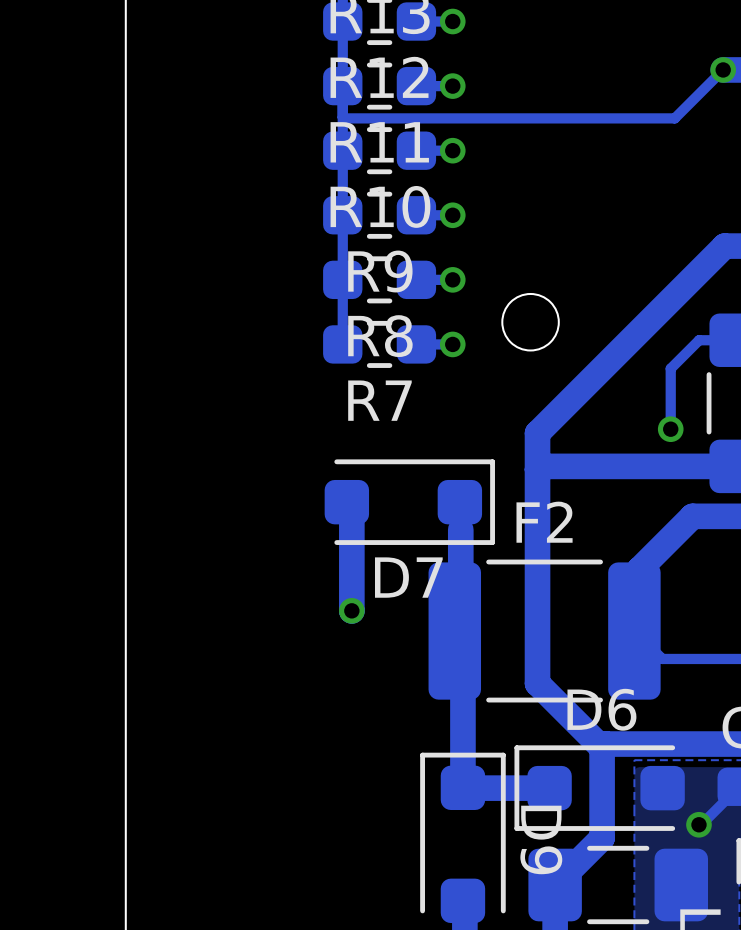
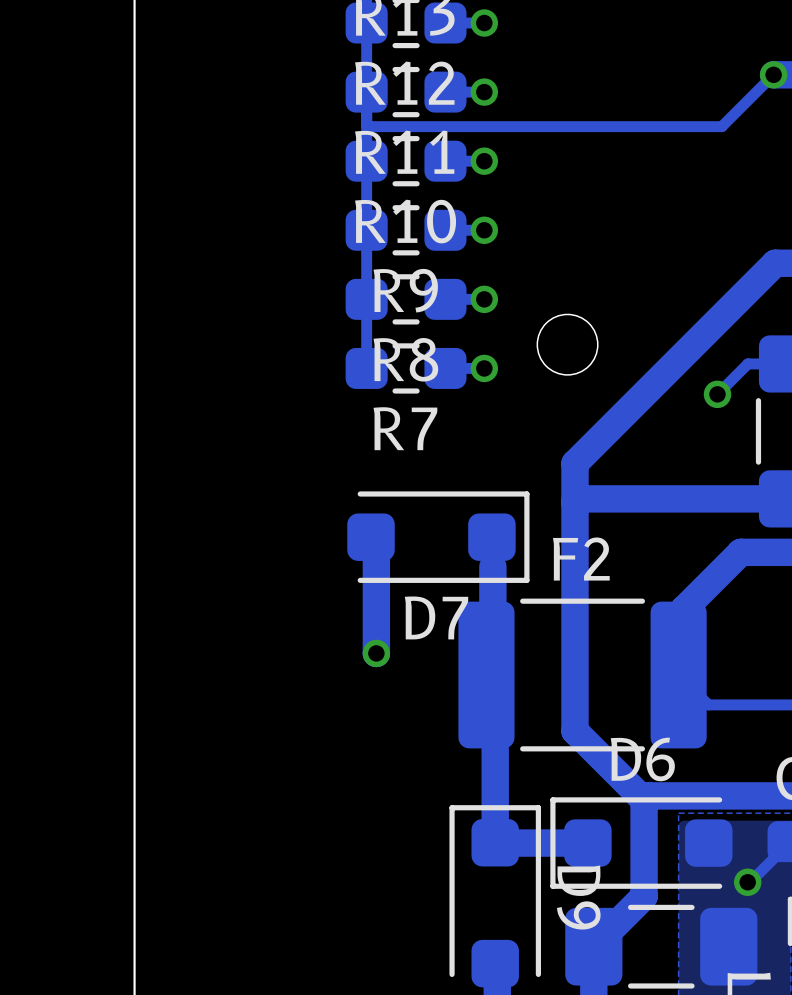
track: (670, 368) (670, 429) -> none
via position: (670, 429) -> (717, 394)

